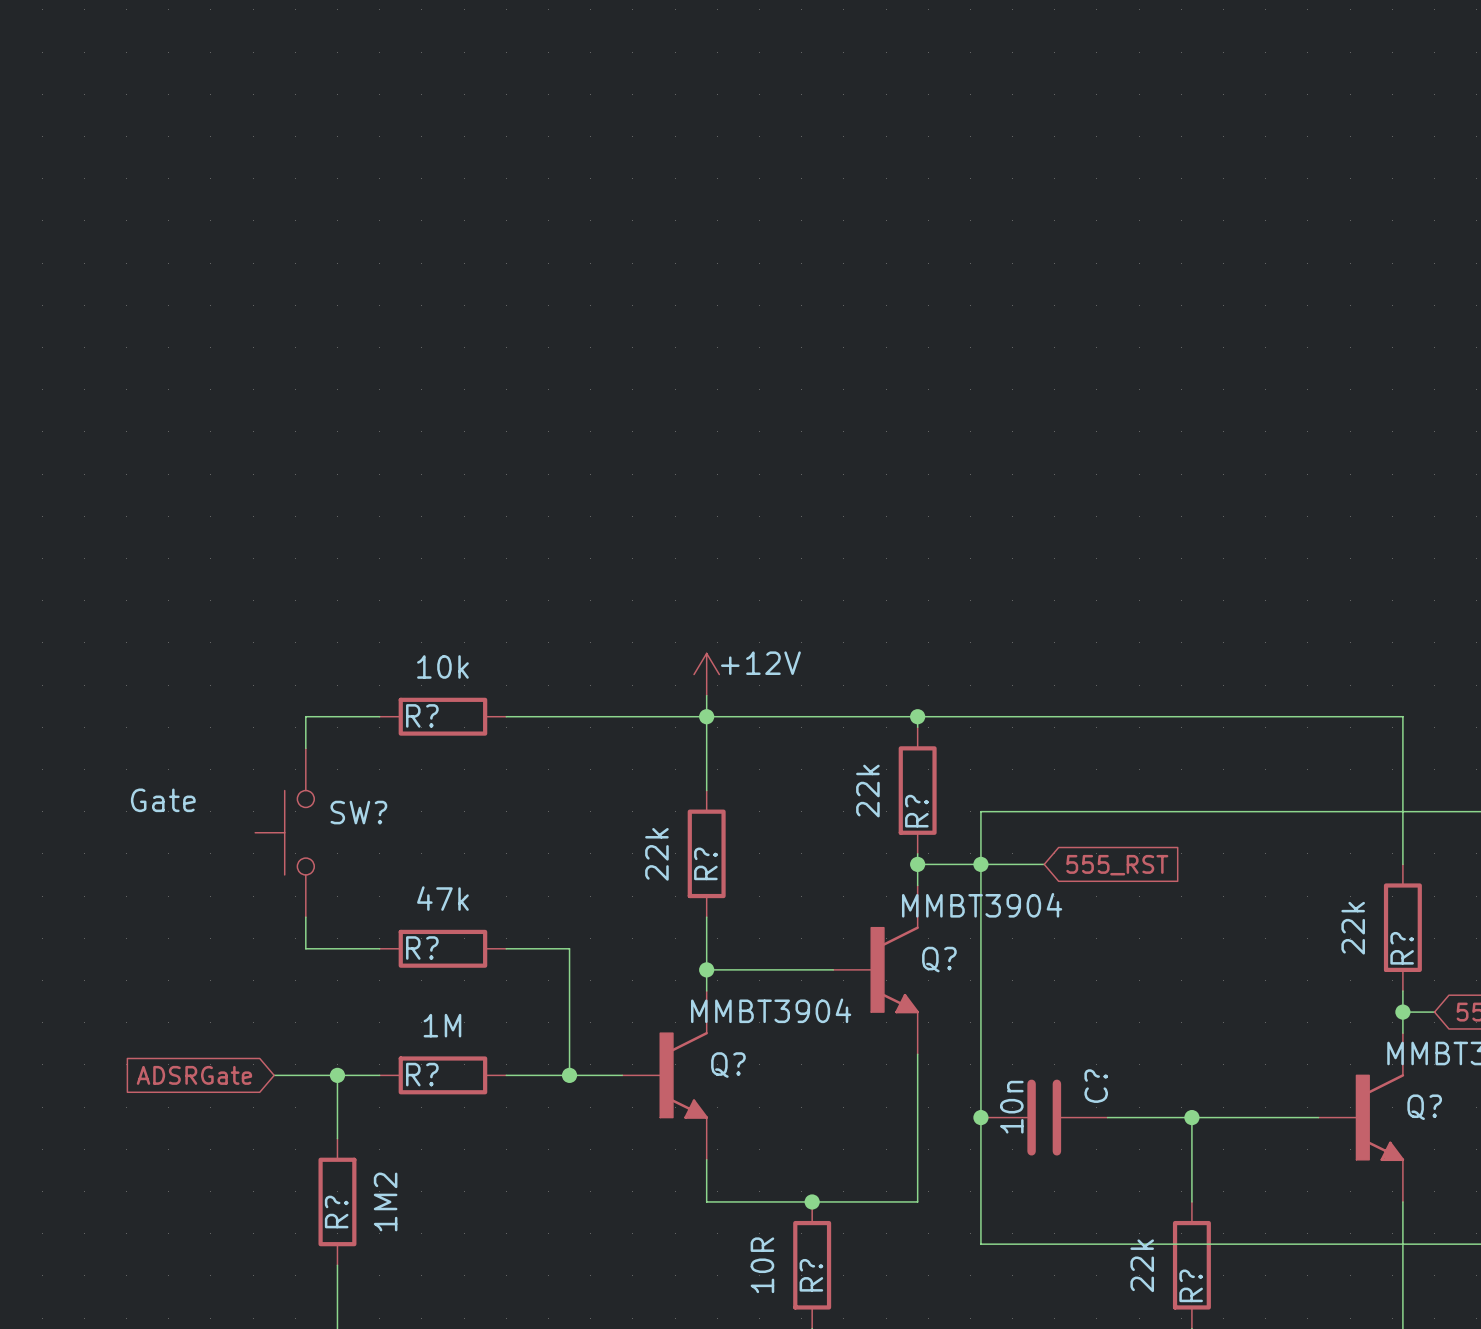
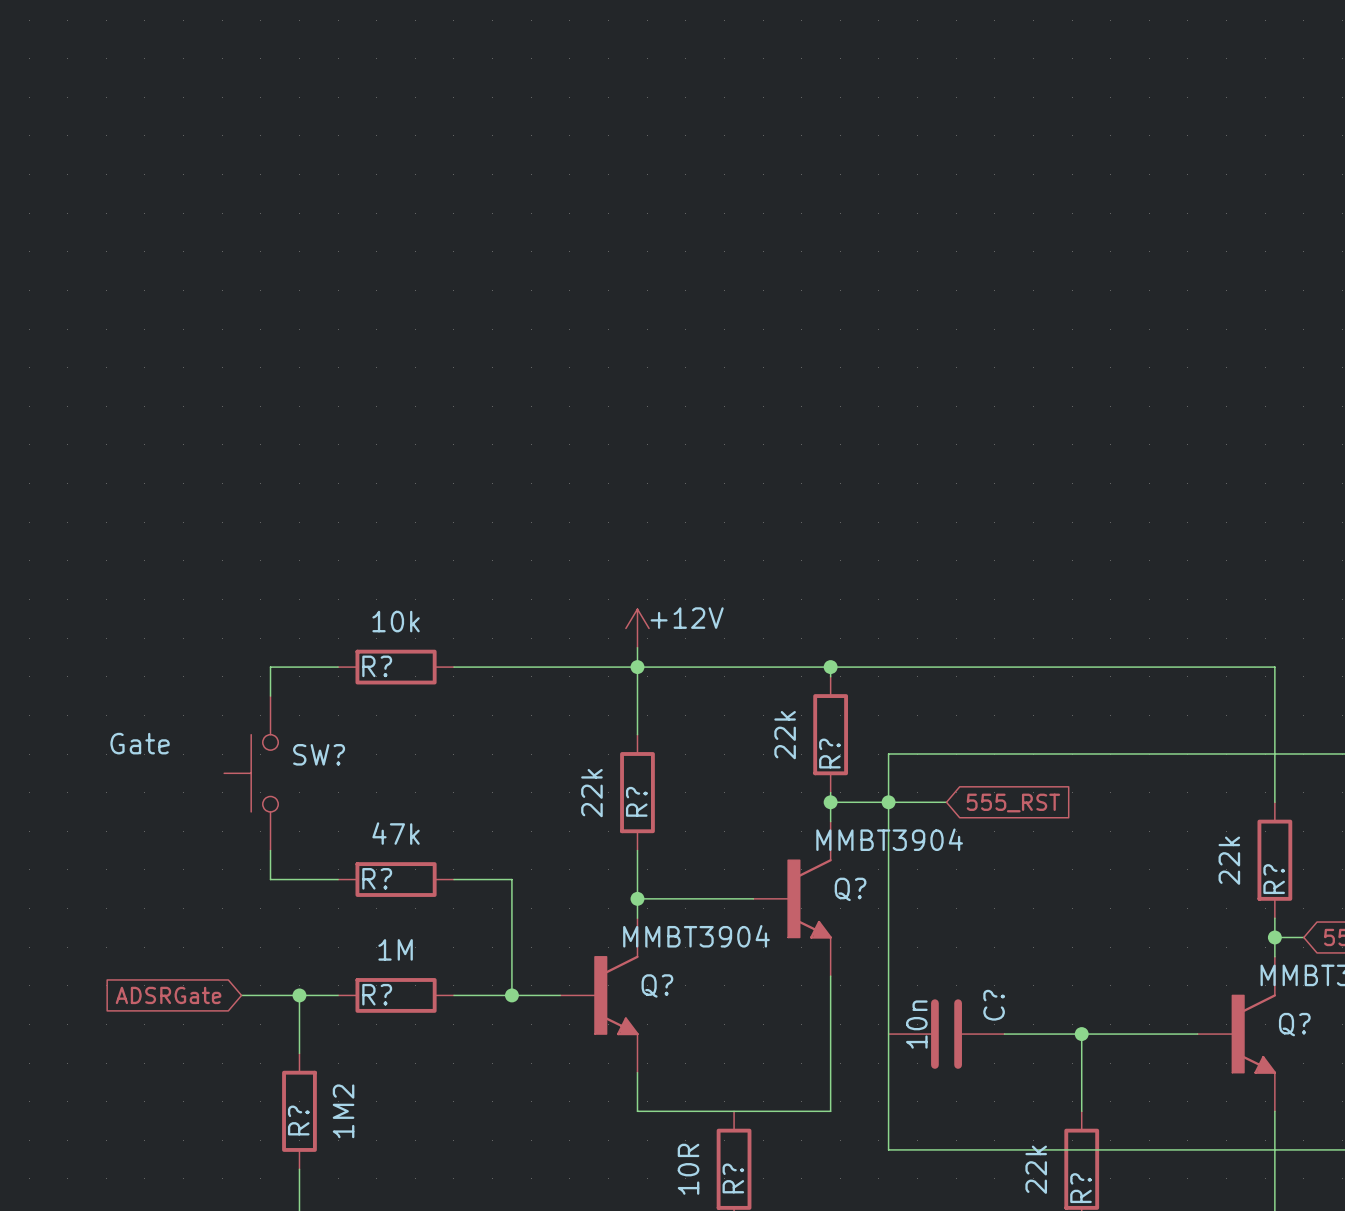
junction: (980, 1117) -> none
junction: (812, 1201) -> none

